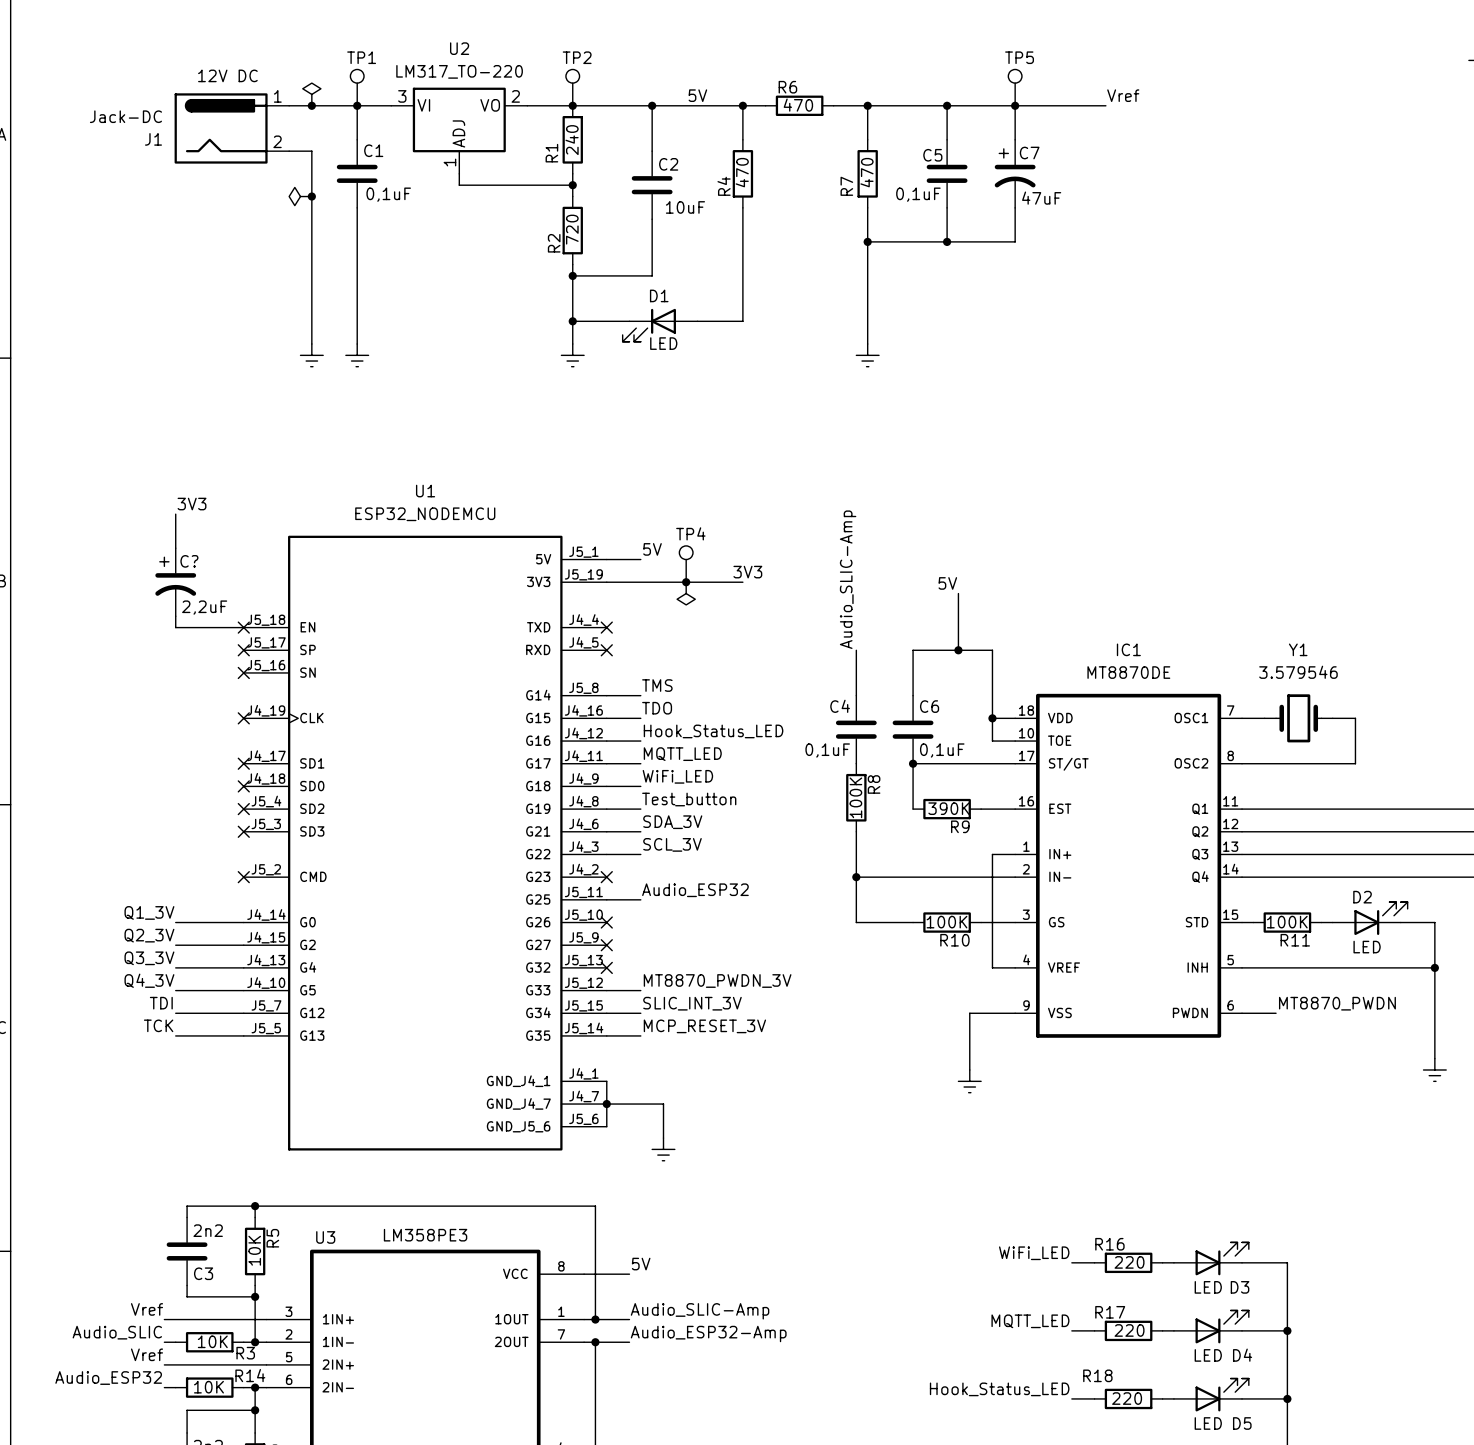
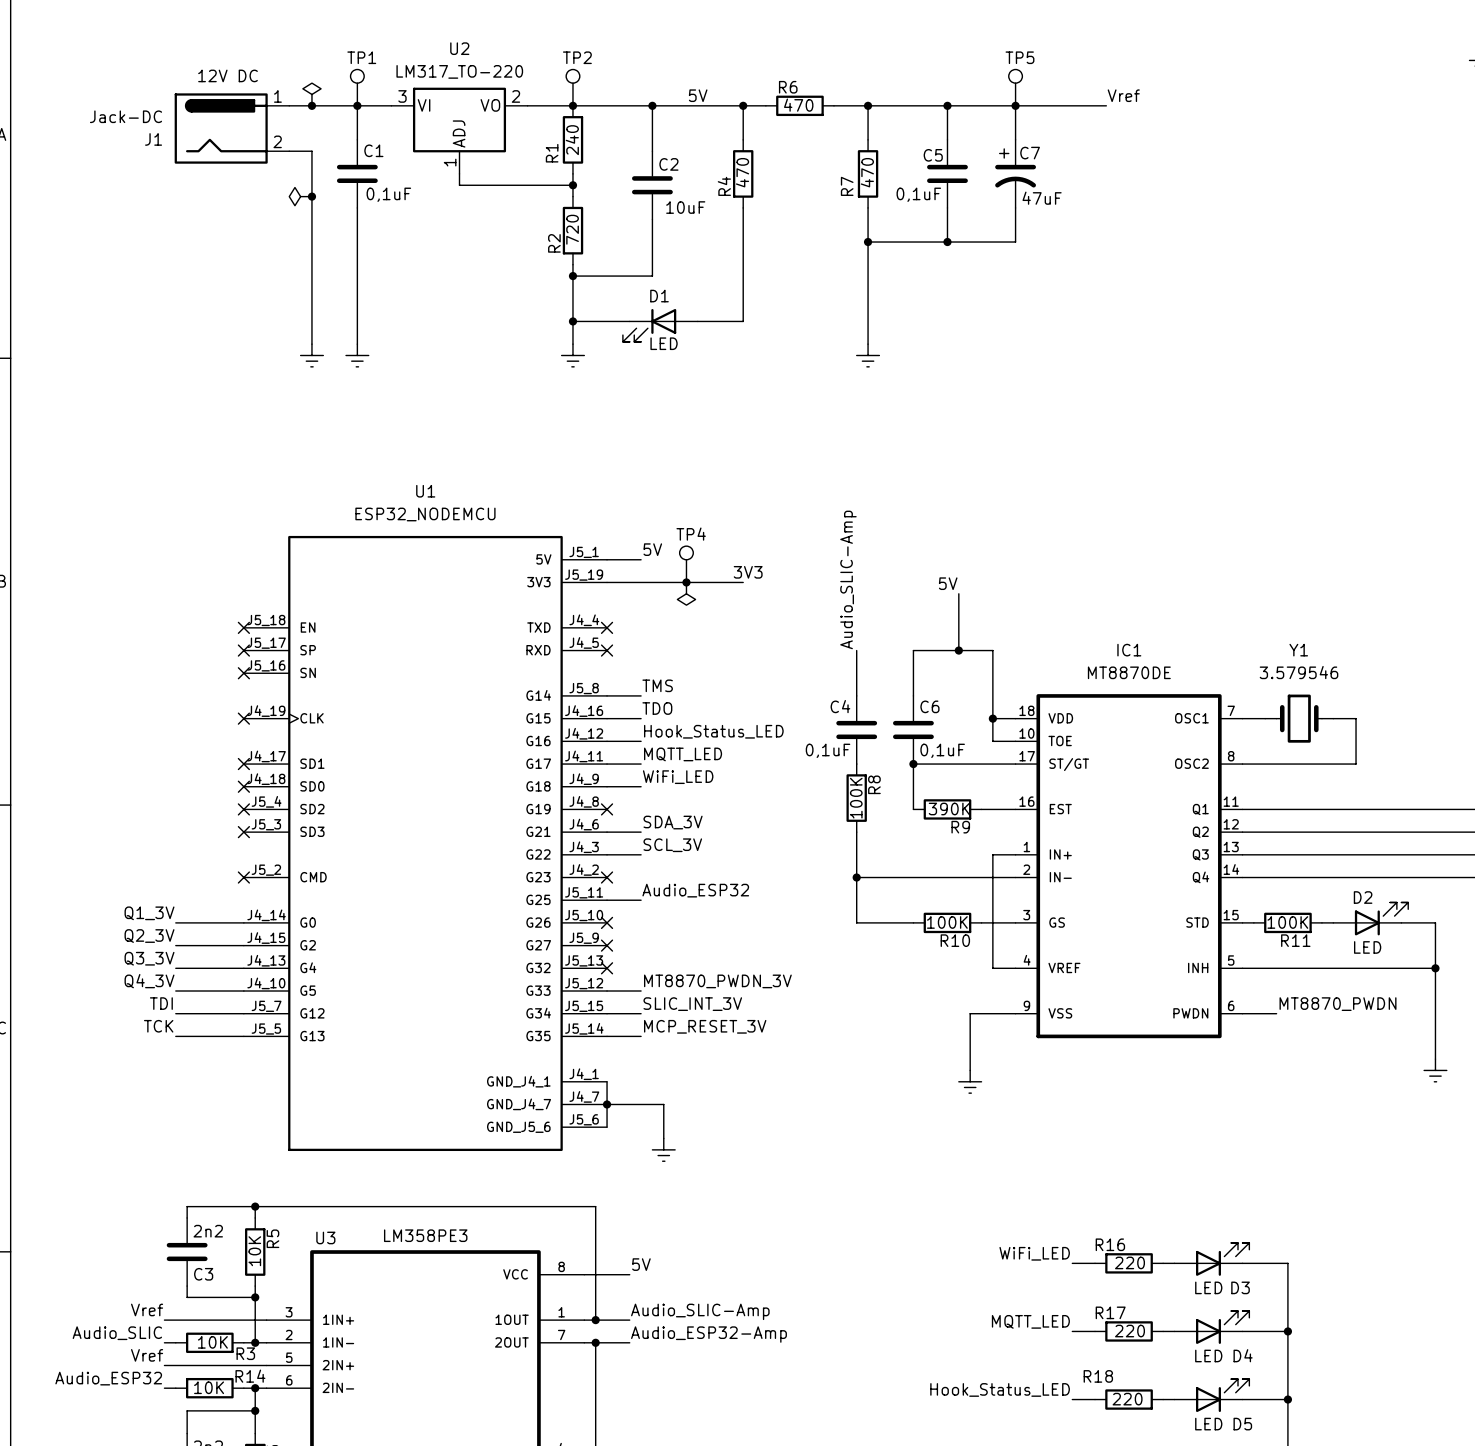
label: 3V3 (192, 504) -> none
wire: (175, 514) (175, 548) -> none
C?: 2,2uF (175, 582) -> none
wire: (175, 616) (175, 627) (243, 627) -> none
label: Test_button (689, 799) -> none
wire: (606, 809) (640, 809) -> none
no-connect mark: none -> (607, 809)

